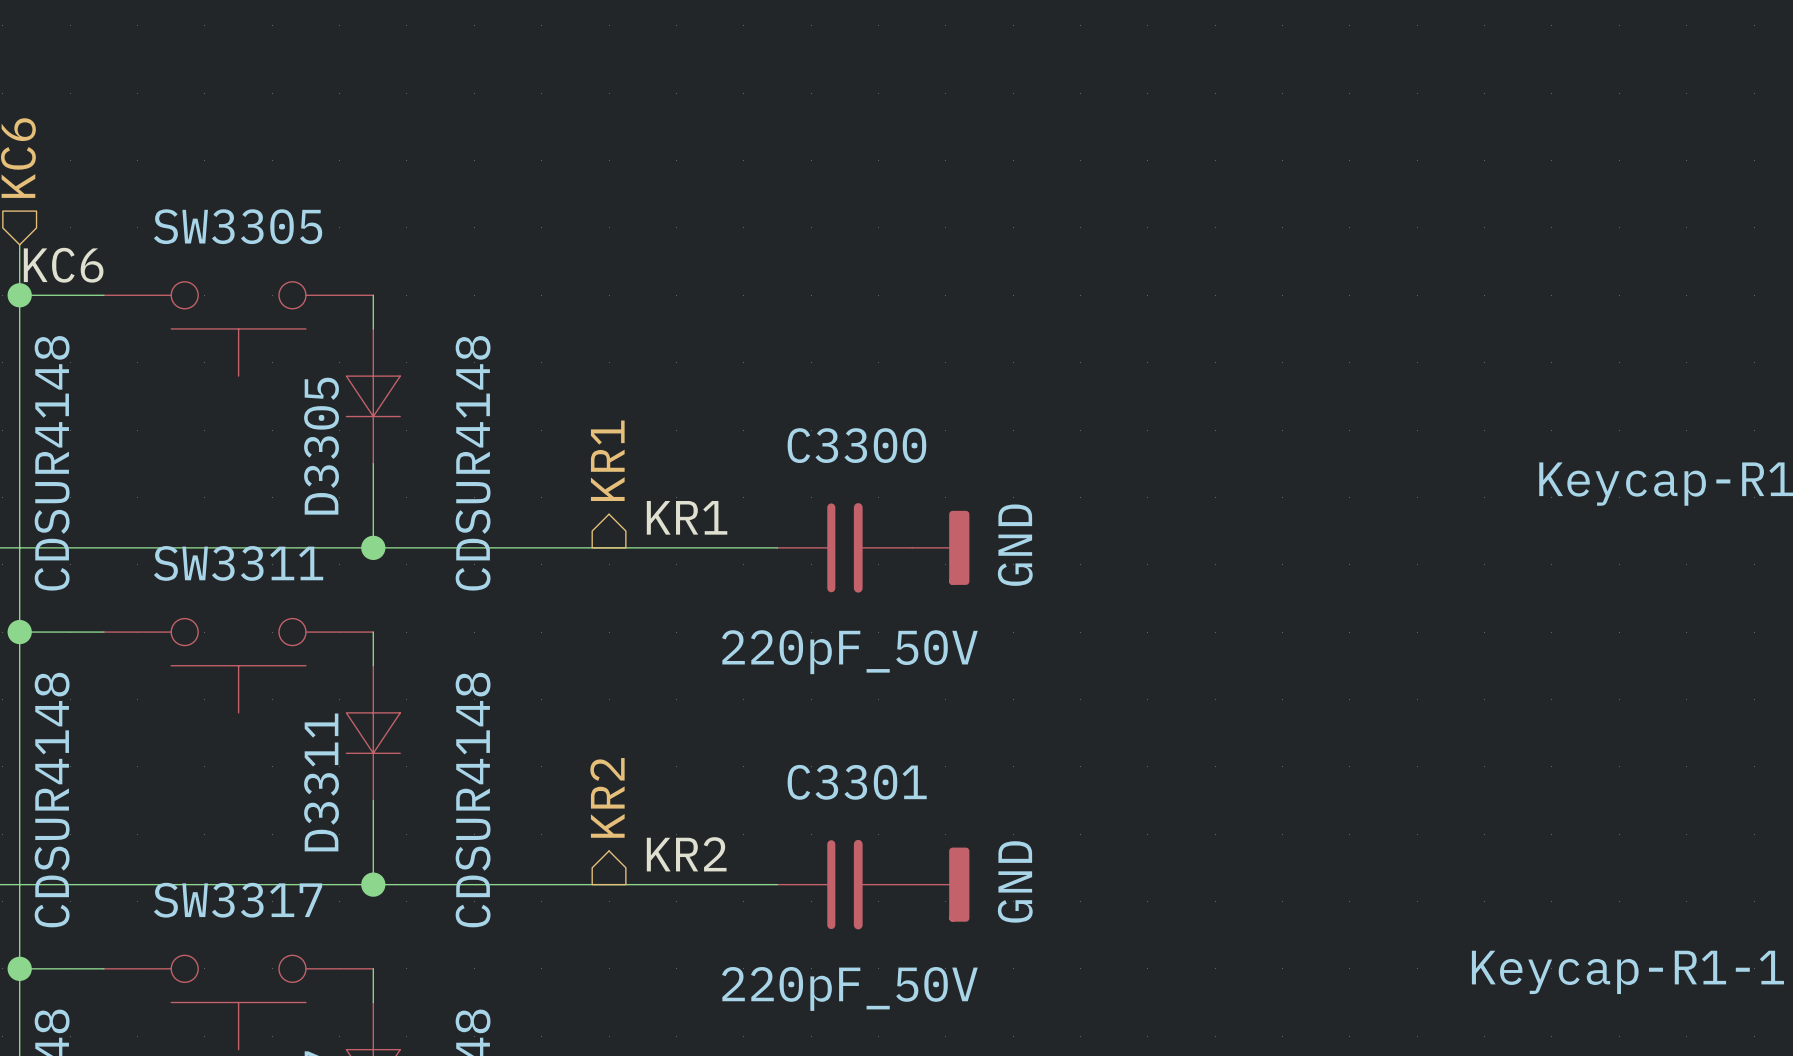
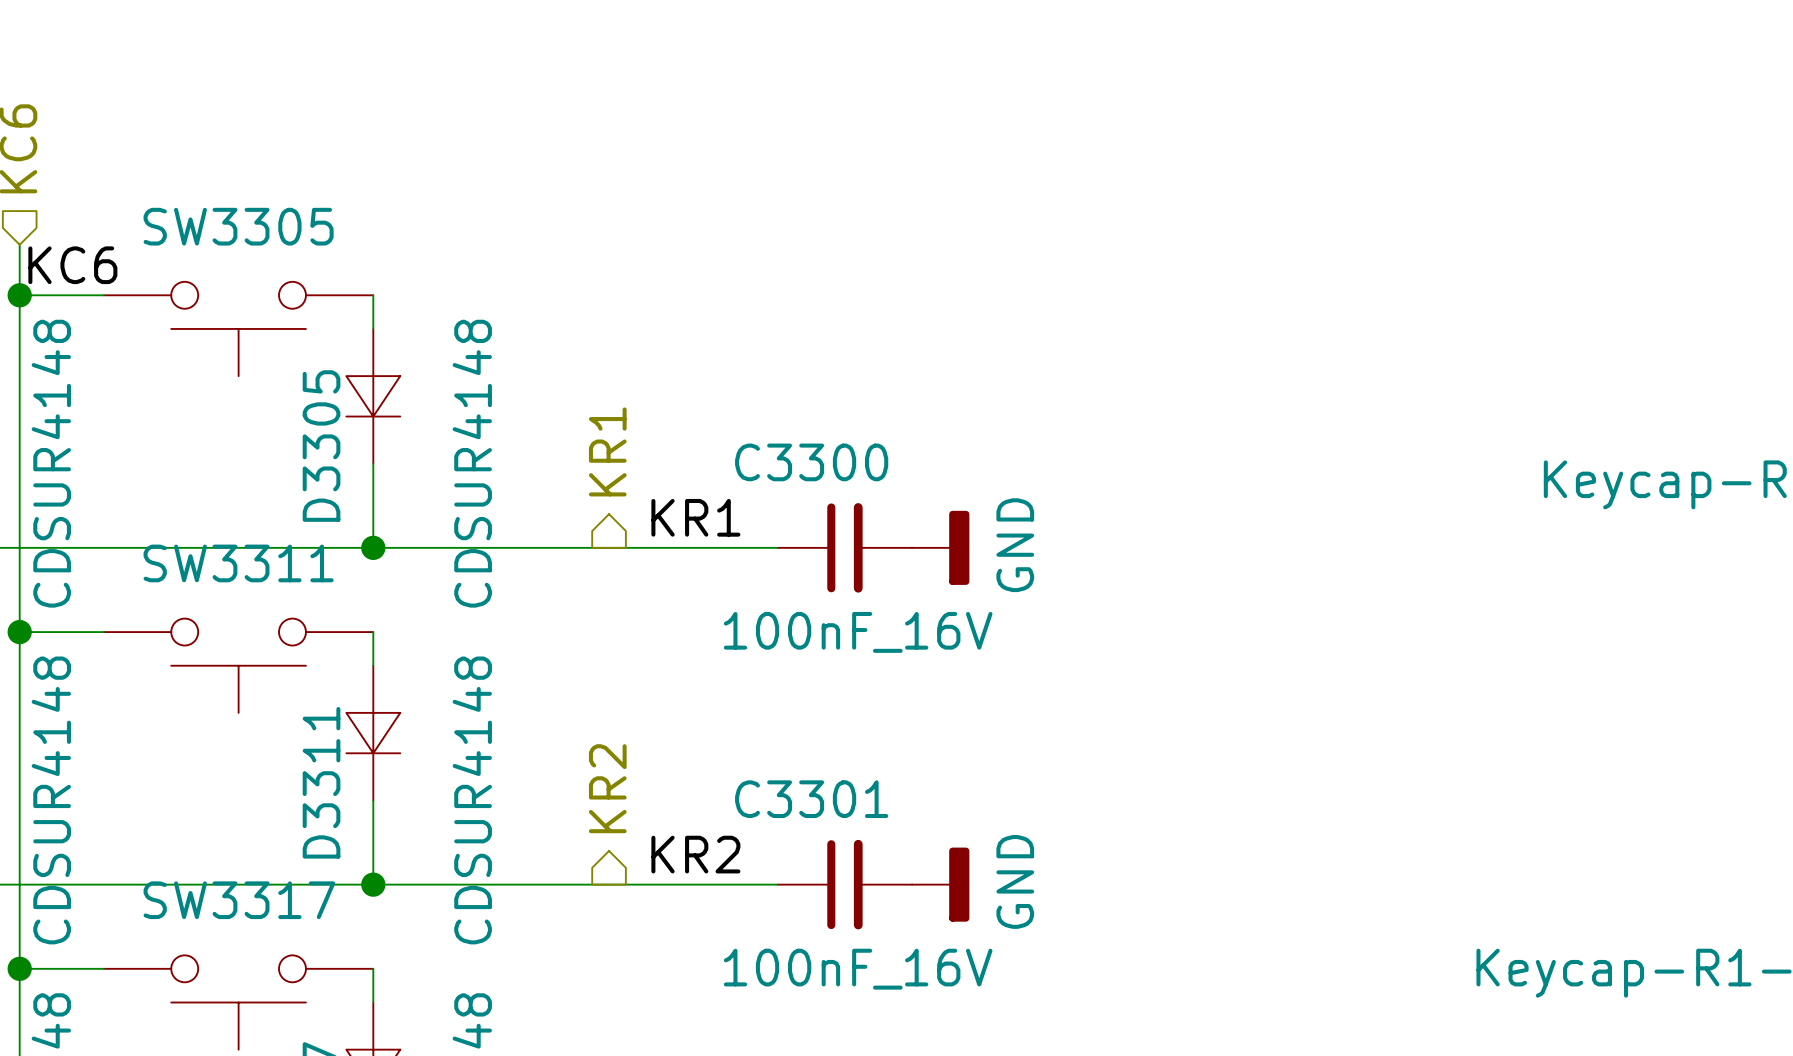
C3300 name position: C3300 (856, 445) -> C3300 (811, 462)
C3300 value: 220pF_50V (849, 652) -> 100nF_16V (858, 632)
C3301 name position: C3301 (857, 782) -> C3301 (811, 799)
C3301 value: 220pF_50V (849, 988) -> 100nF_16V (858, 969)

